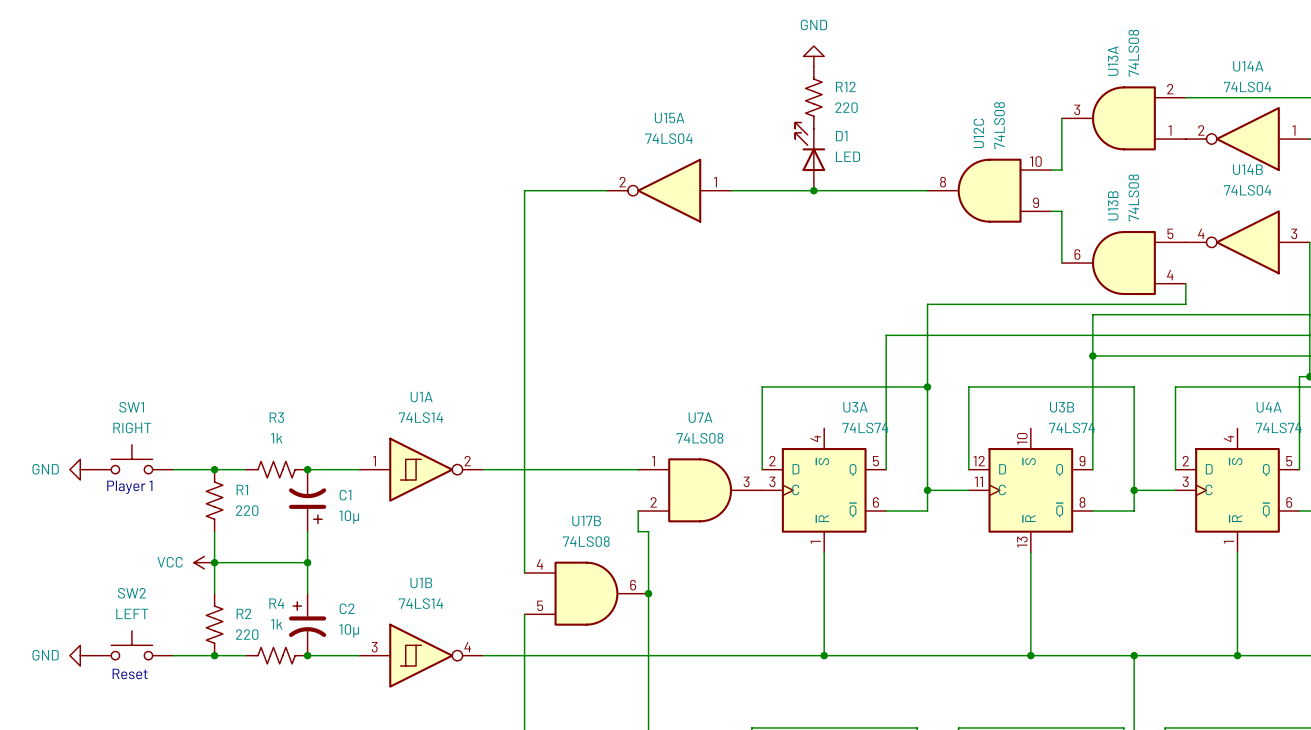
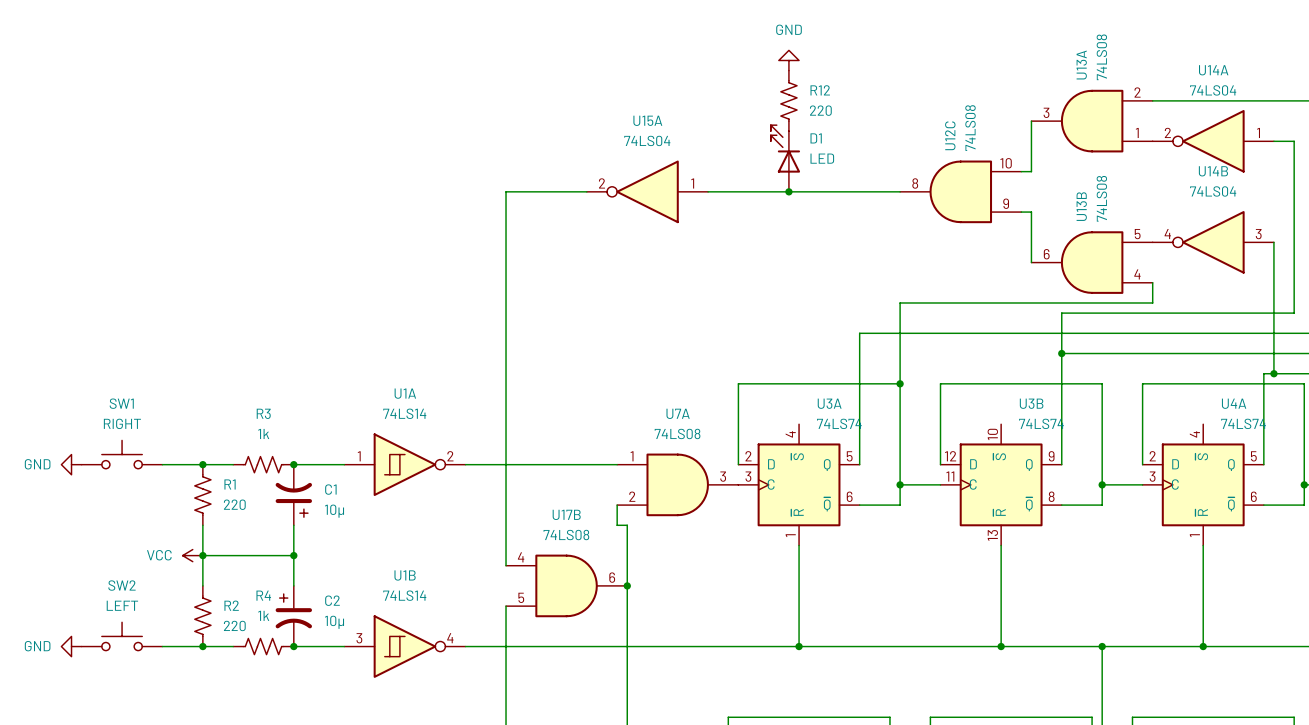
text: Player 1 (129, 487) -> none
text: Reset (130, 673) -> none

